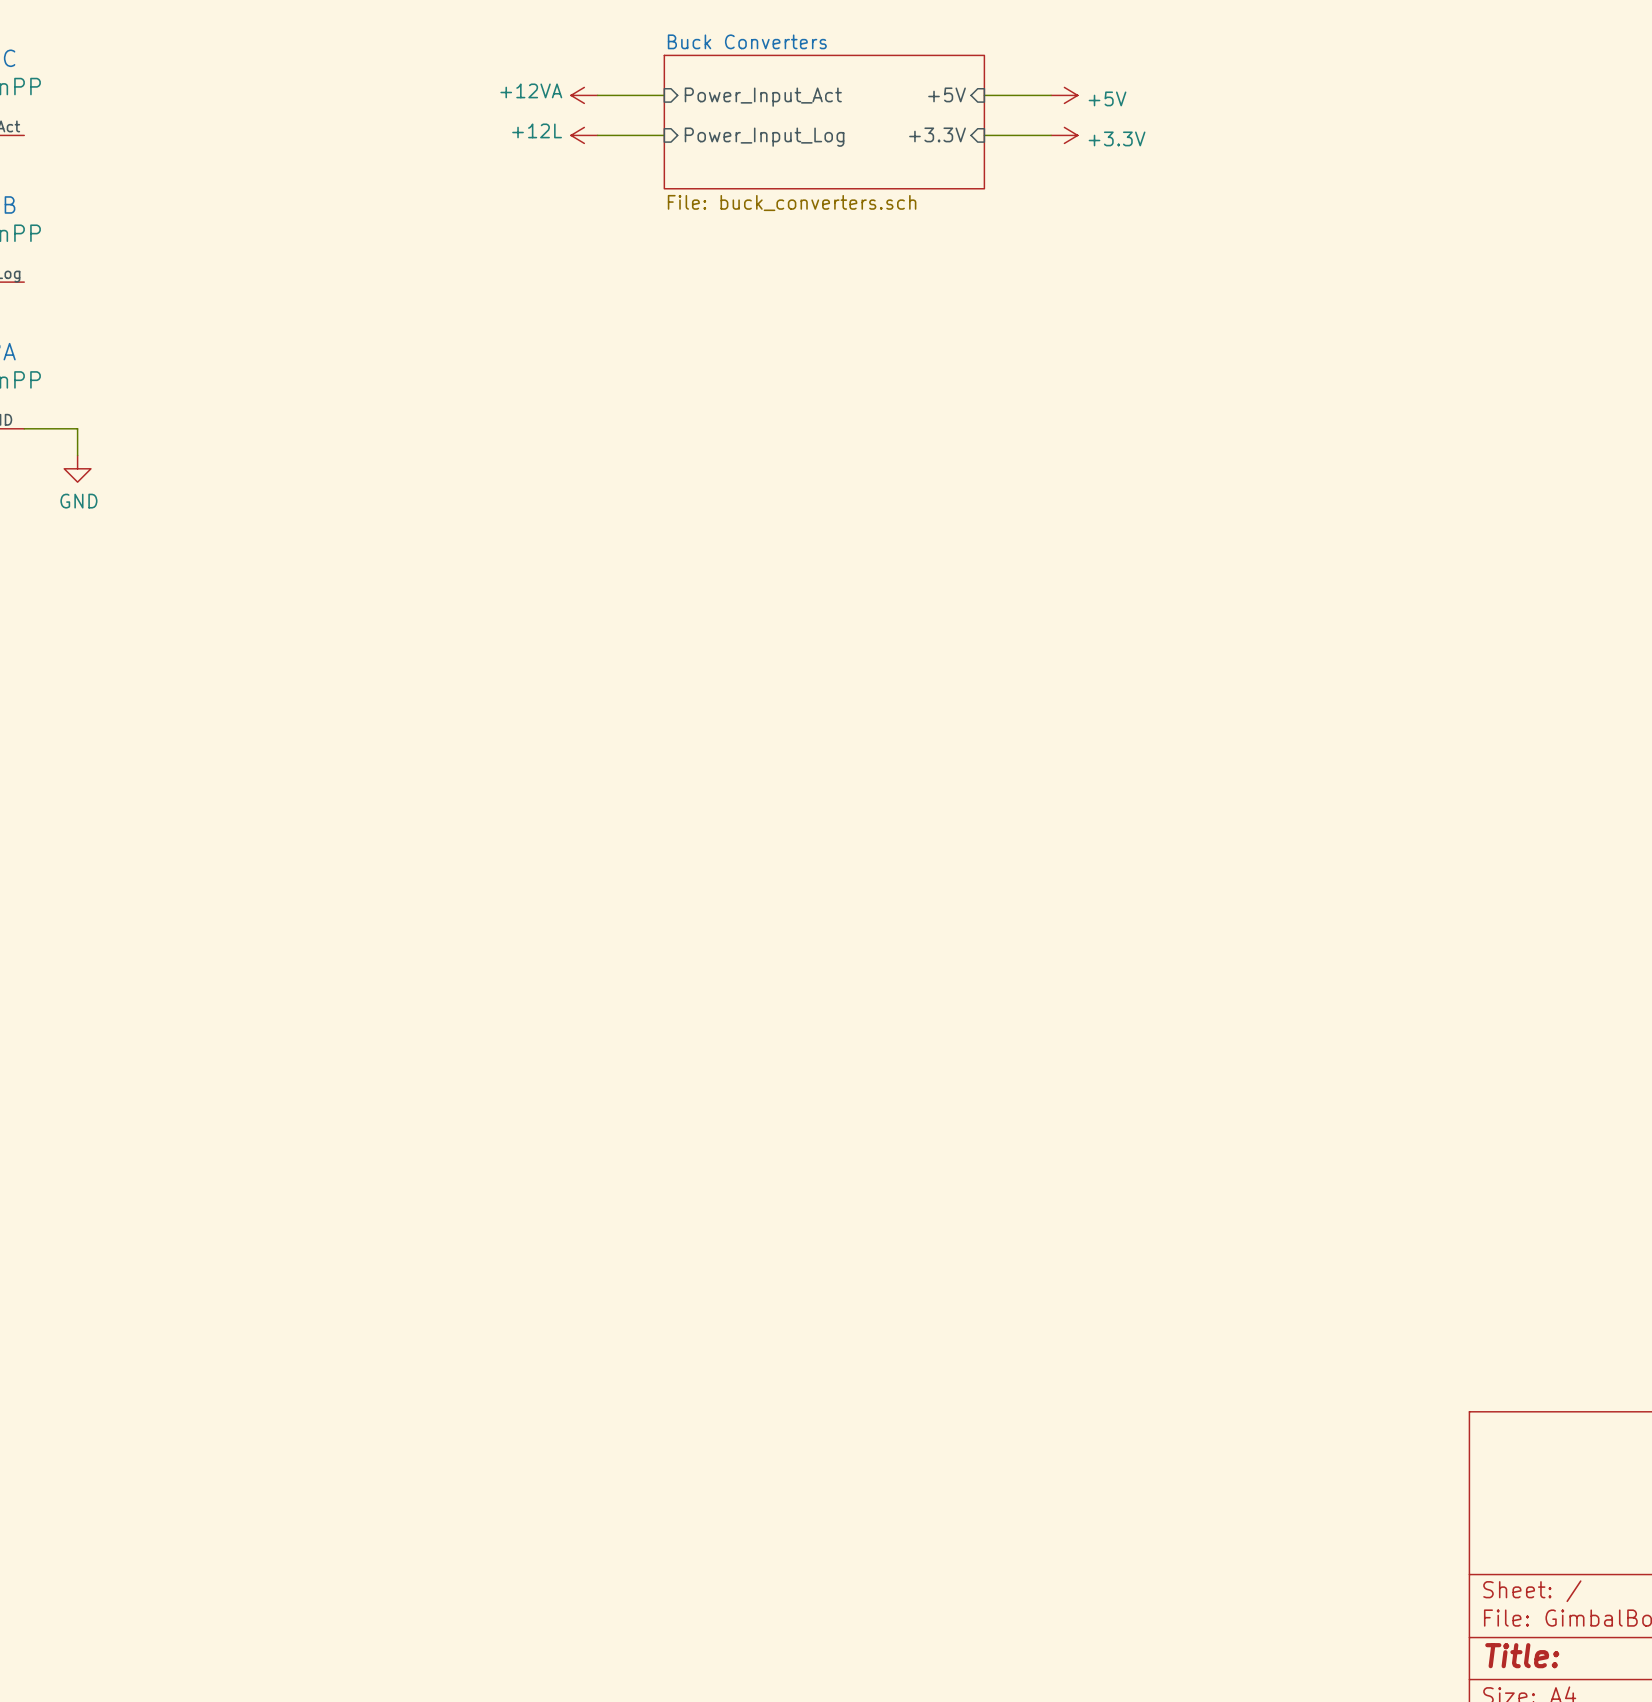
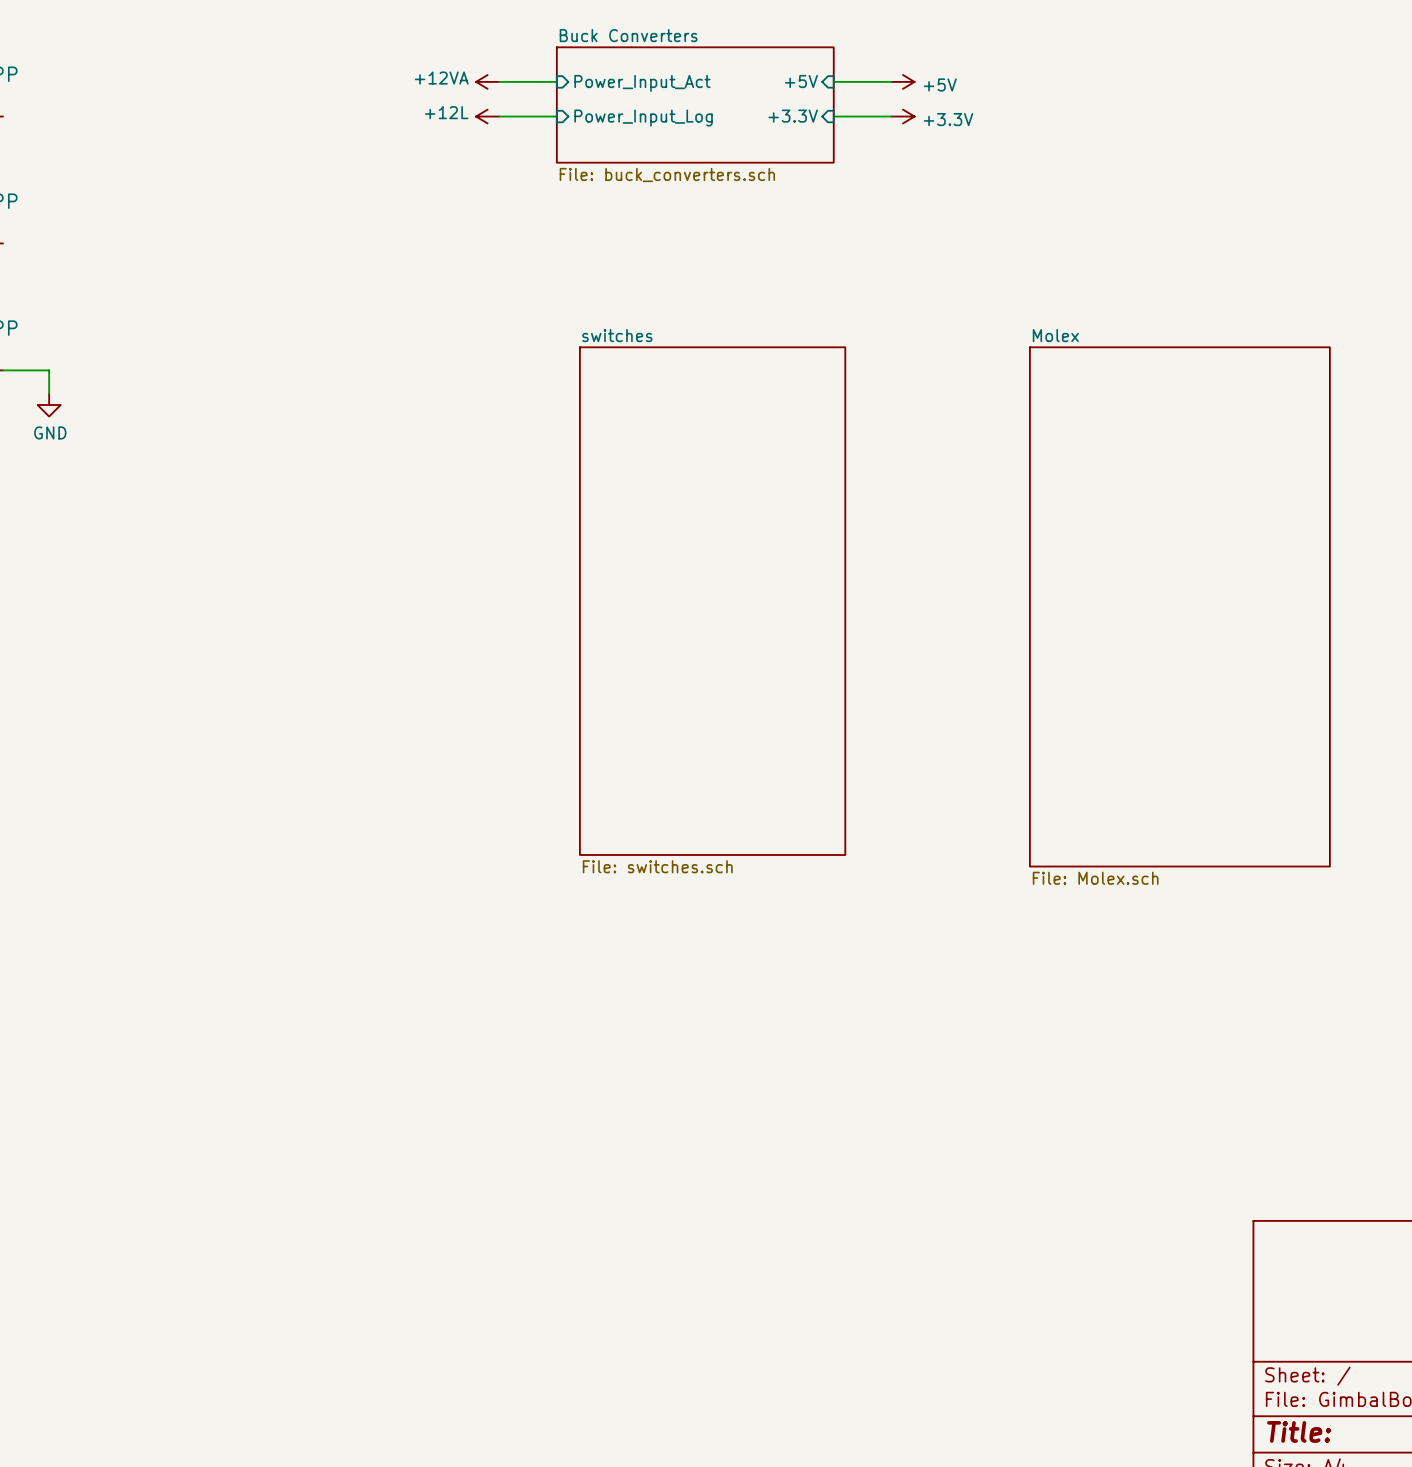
sheet switches: none -> File: switches.sch (712, 601)
sheet Molex: none -> File: Molex.sch (1179, 606)

